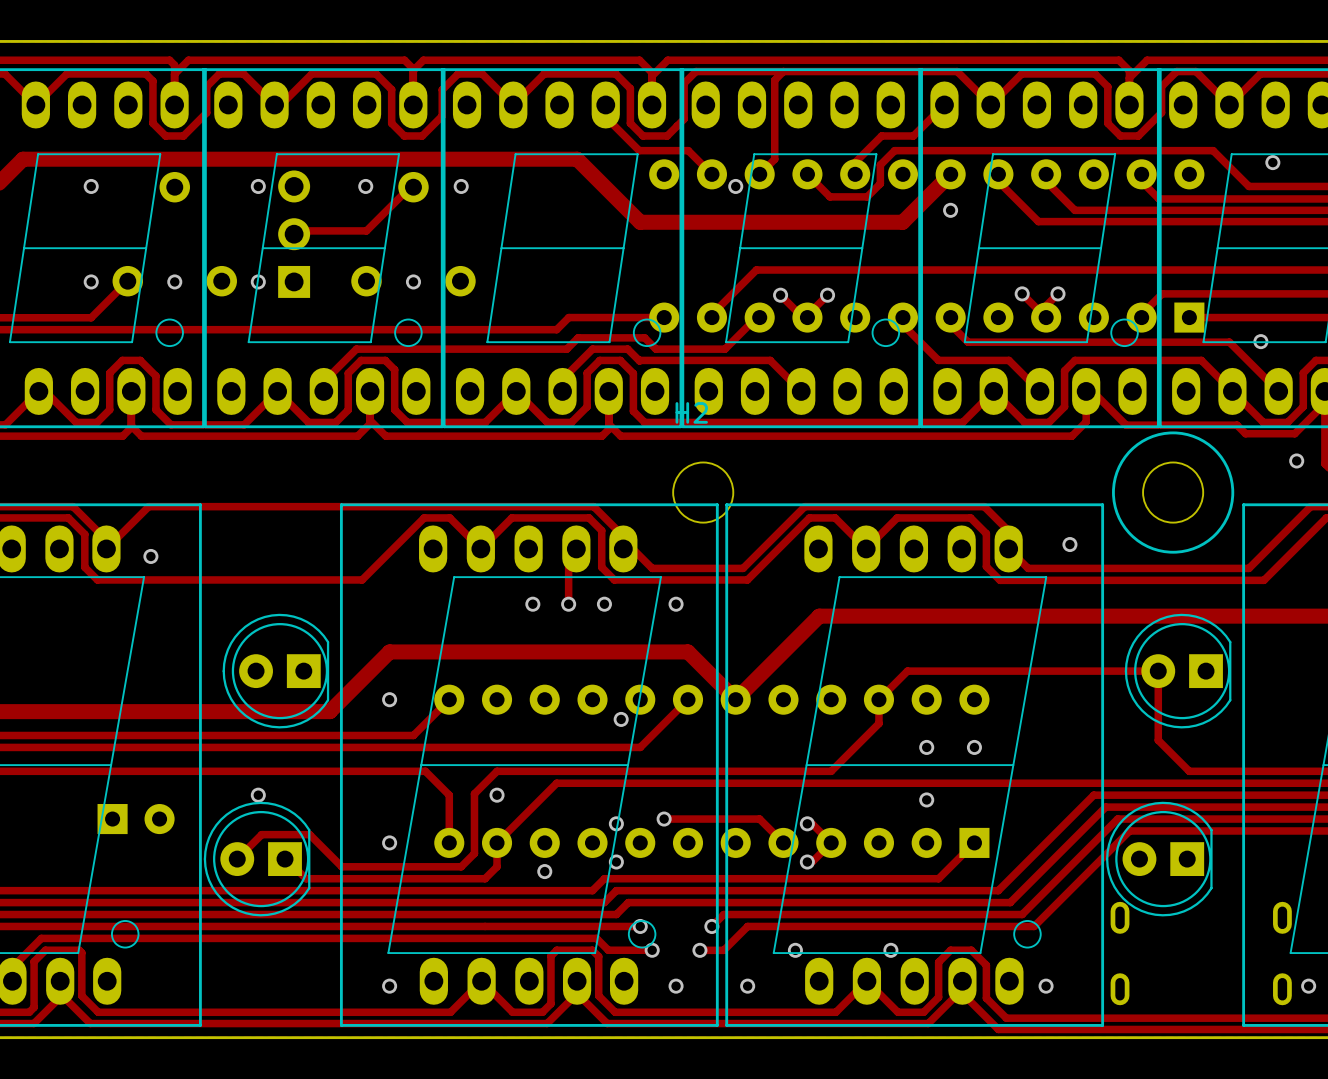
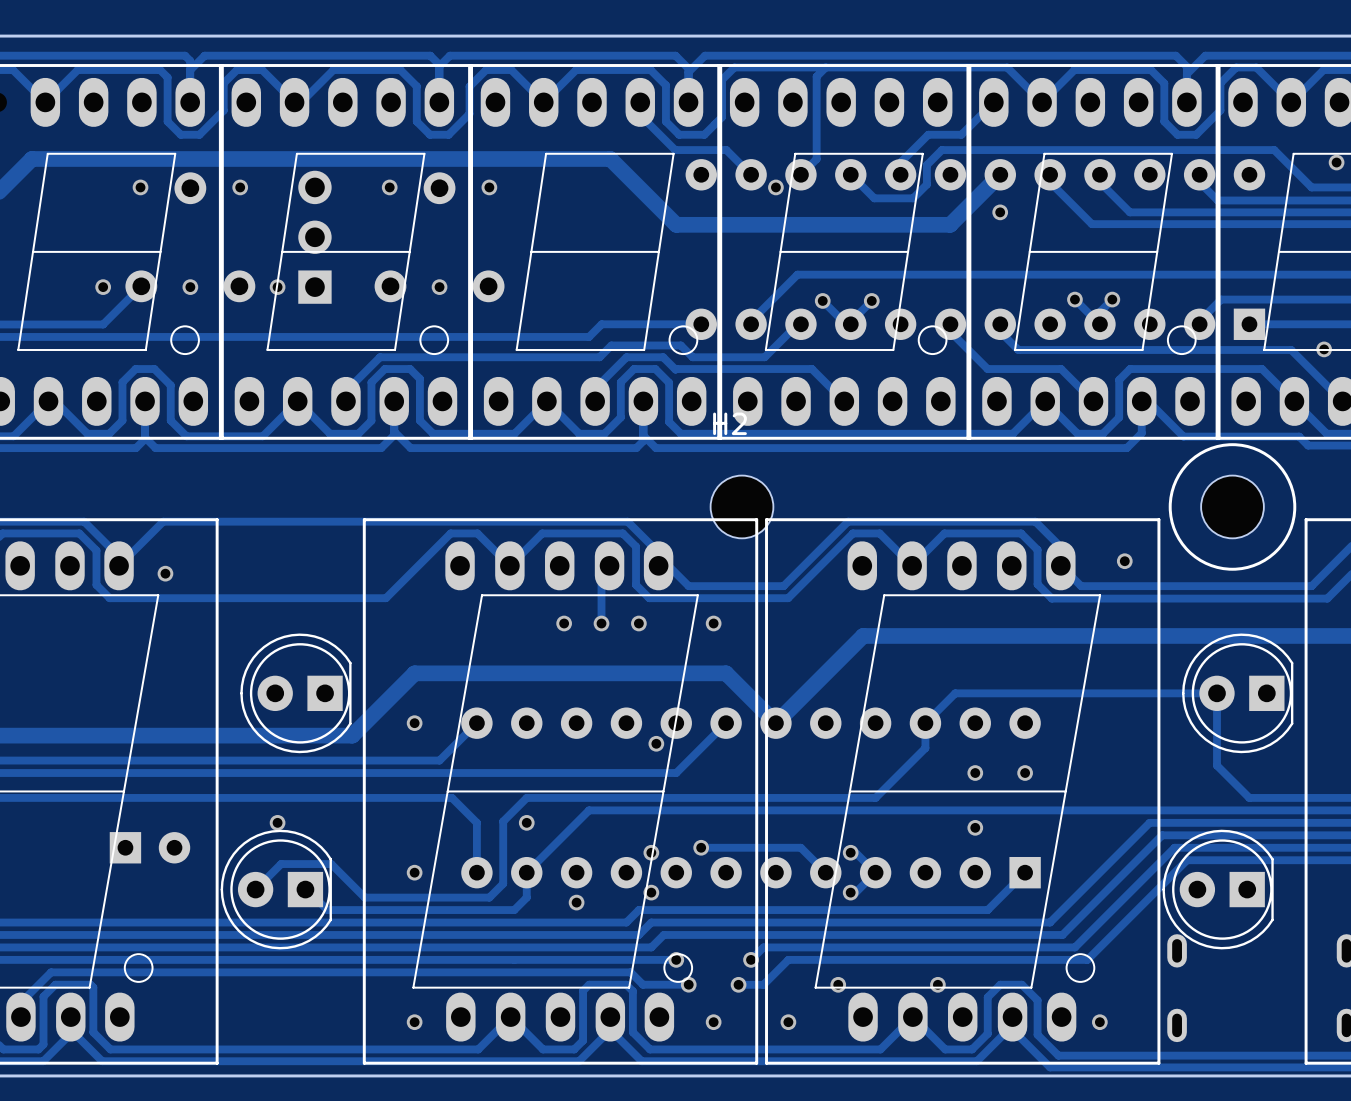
track: (413, 183) (366, 230) (294, 230) -> none
via position: (91, 186) -> (140, 187)
via position: (258, 186) -> (240, 187)

